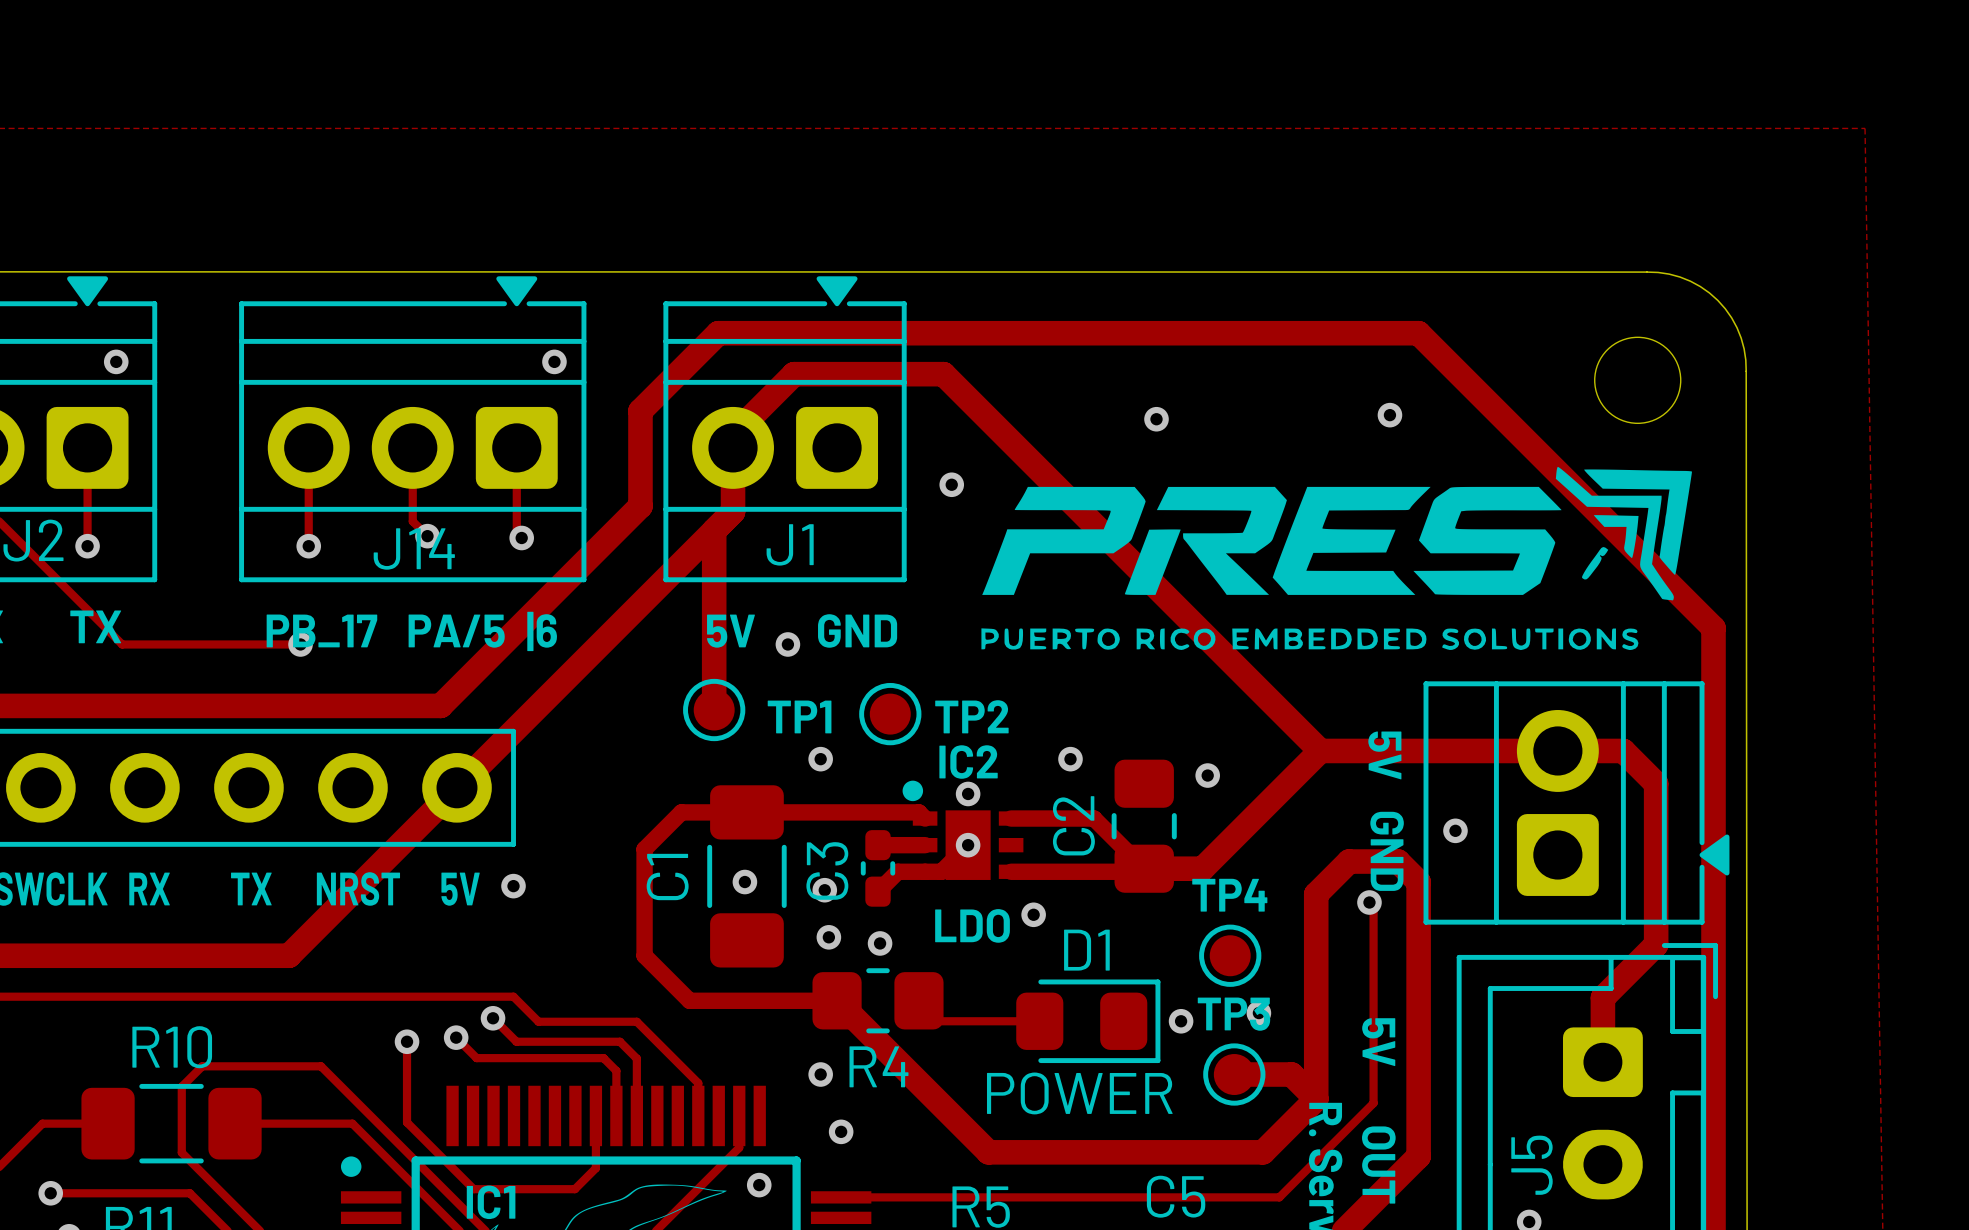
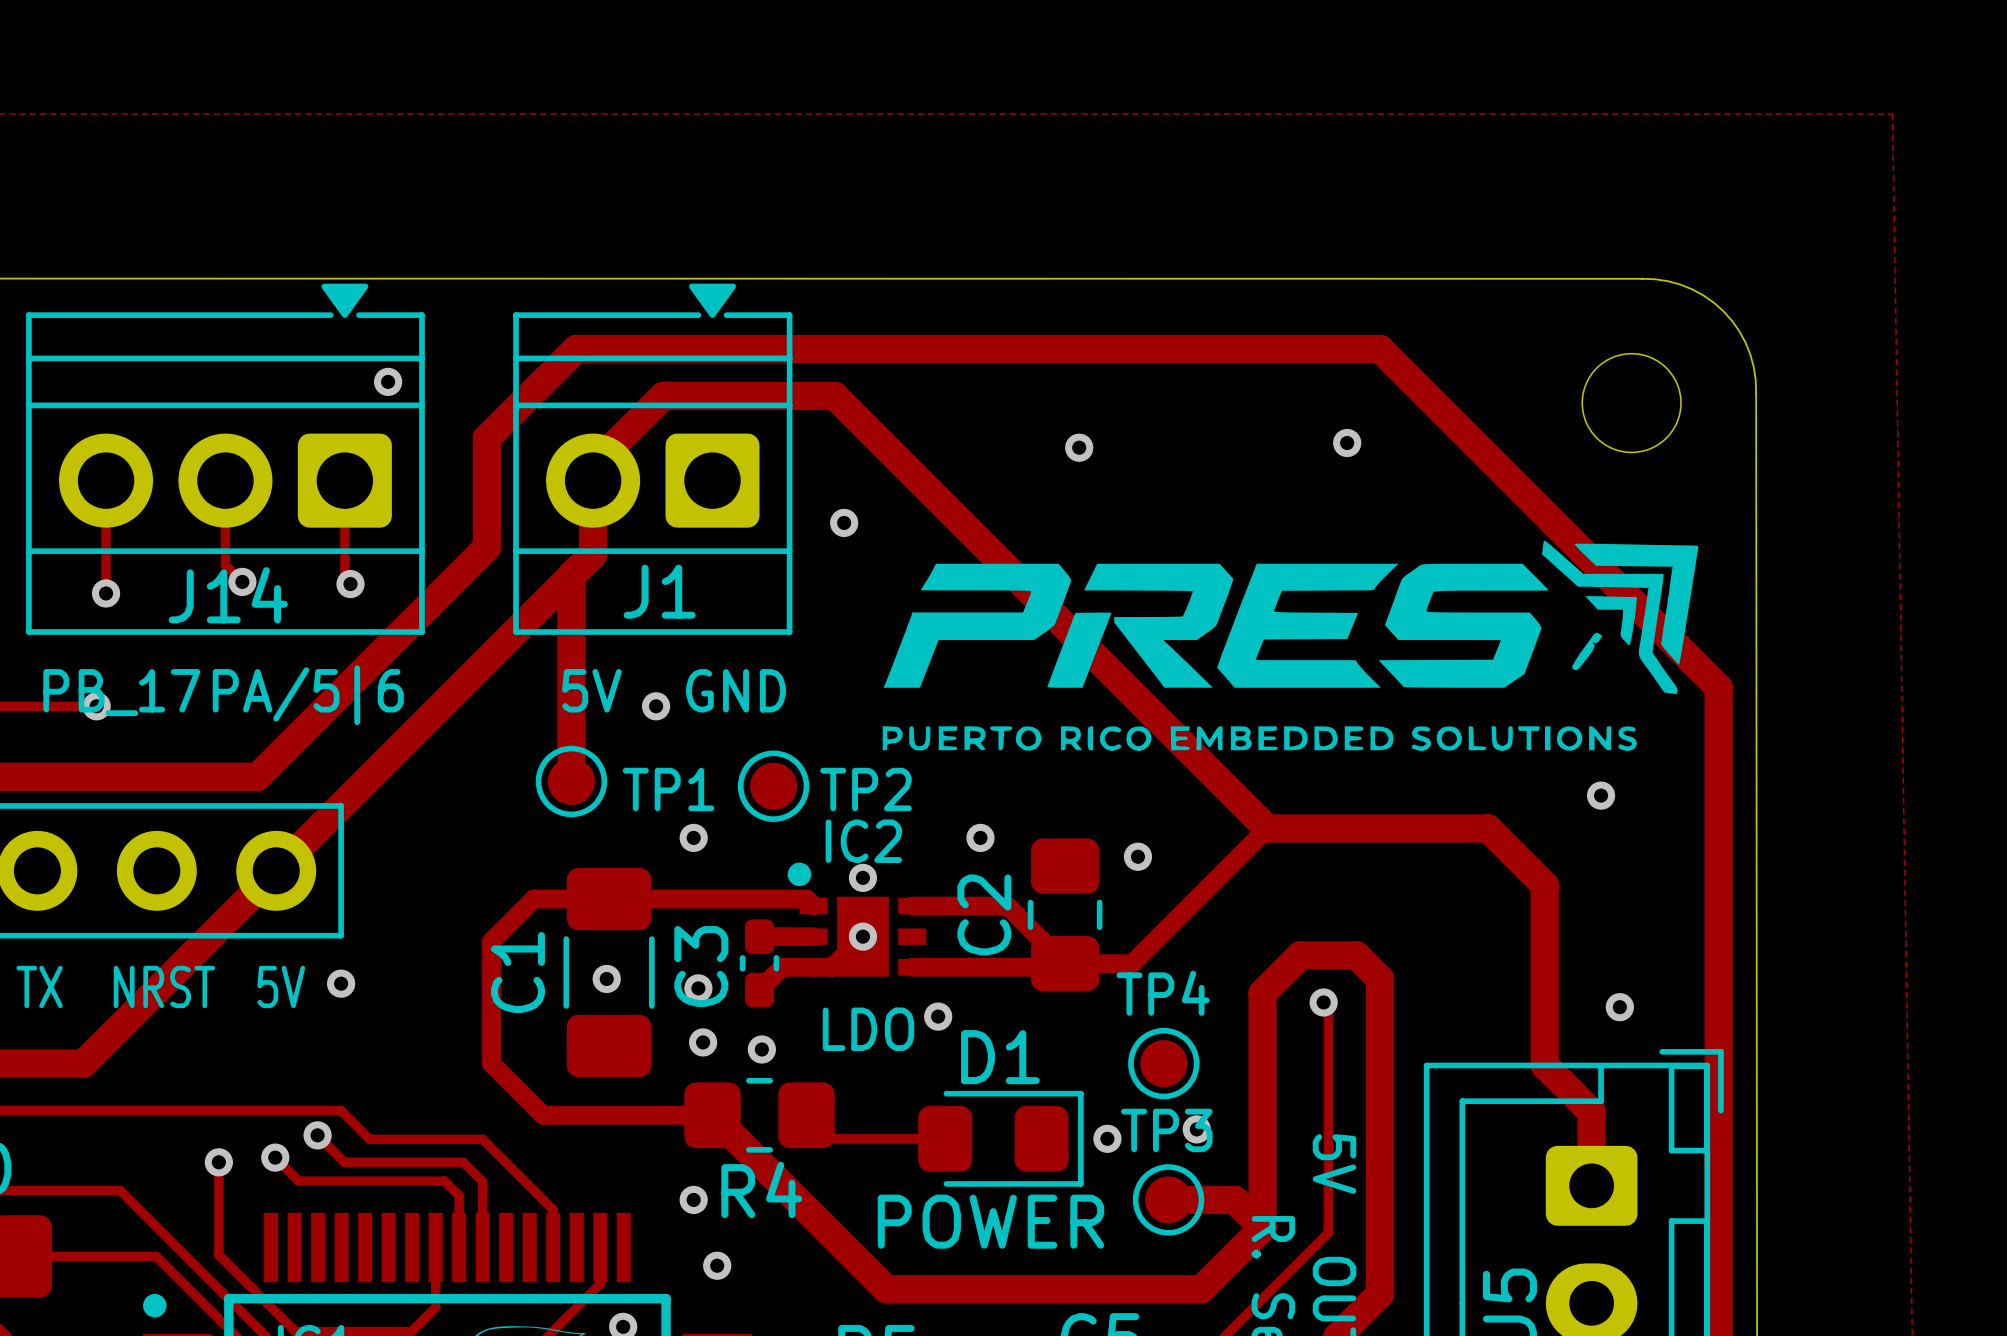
drawing position: (1336, 558) -> (1290, 645)
via: none -> (1601, 795)
track width: thick (1320, 750) (1202, 868) (1144, 868) -> thin (1267, 828) (1132, 963) (1065, 963)
track: (1512, 750) (1623, 750) (1656, 783) (1656, 944) (1602, 997) -> (1488, 828) (1544, 884) (1544, 1064) (1591, 1111)
text: 5V (1384, 755) -> none
part: (1576, 802) -> none
via: (1455, 830) -> none
text: GND (1387, 851) -> none
via: none -> (1619, 1007)

